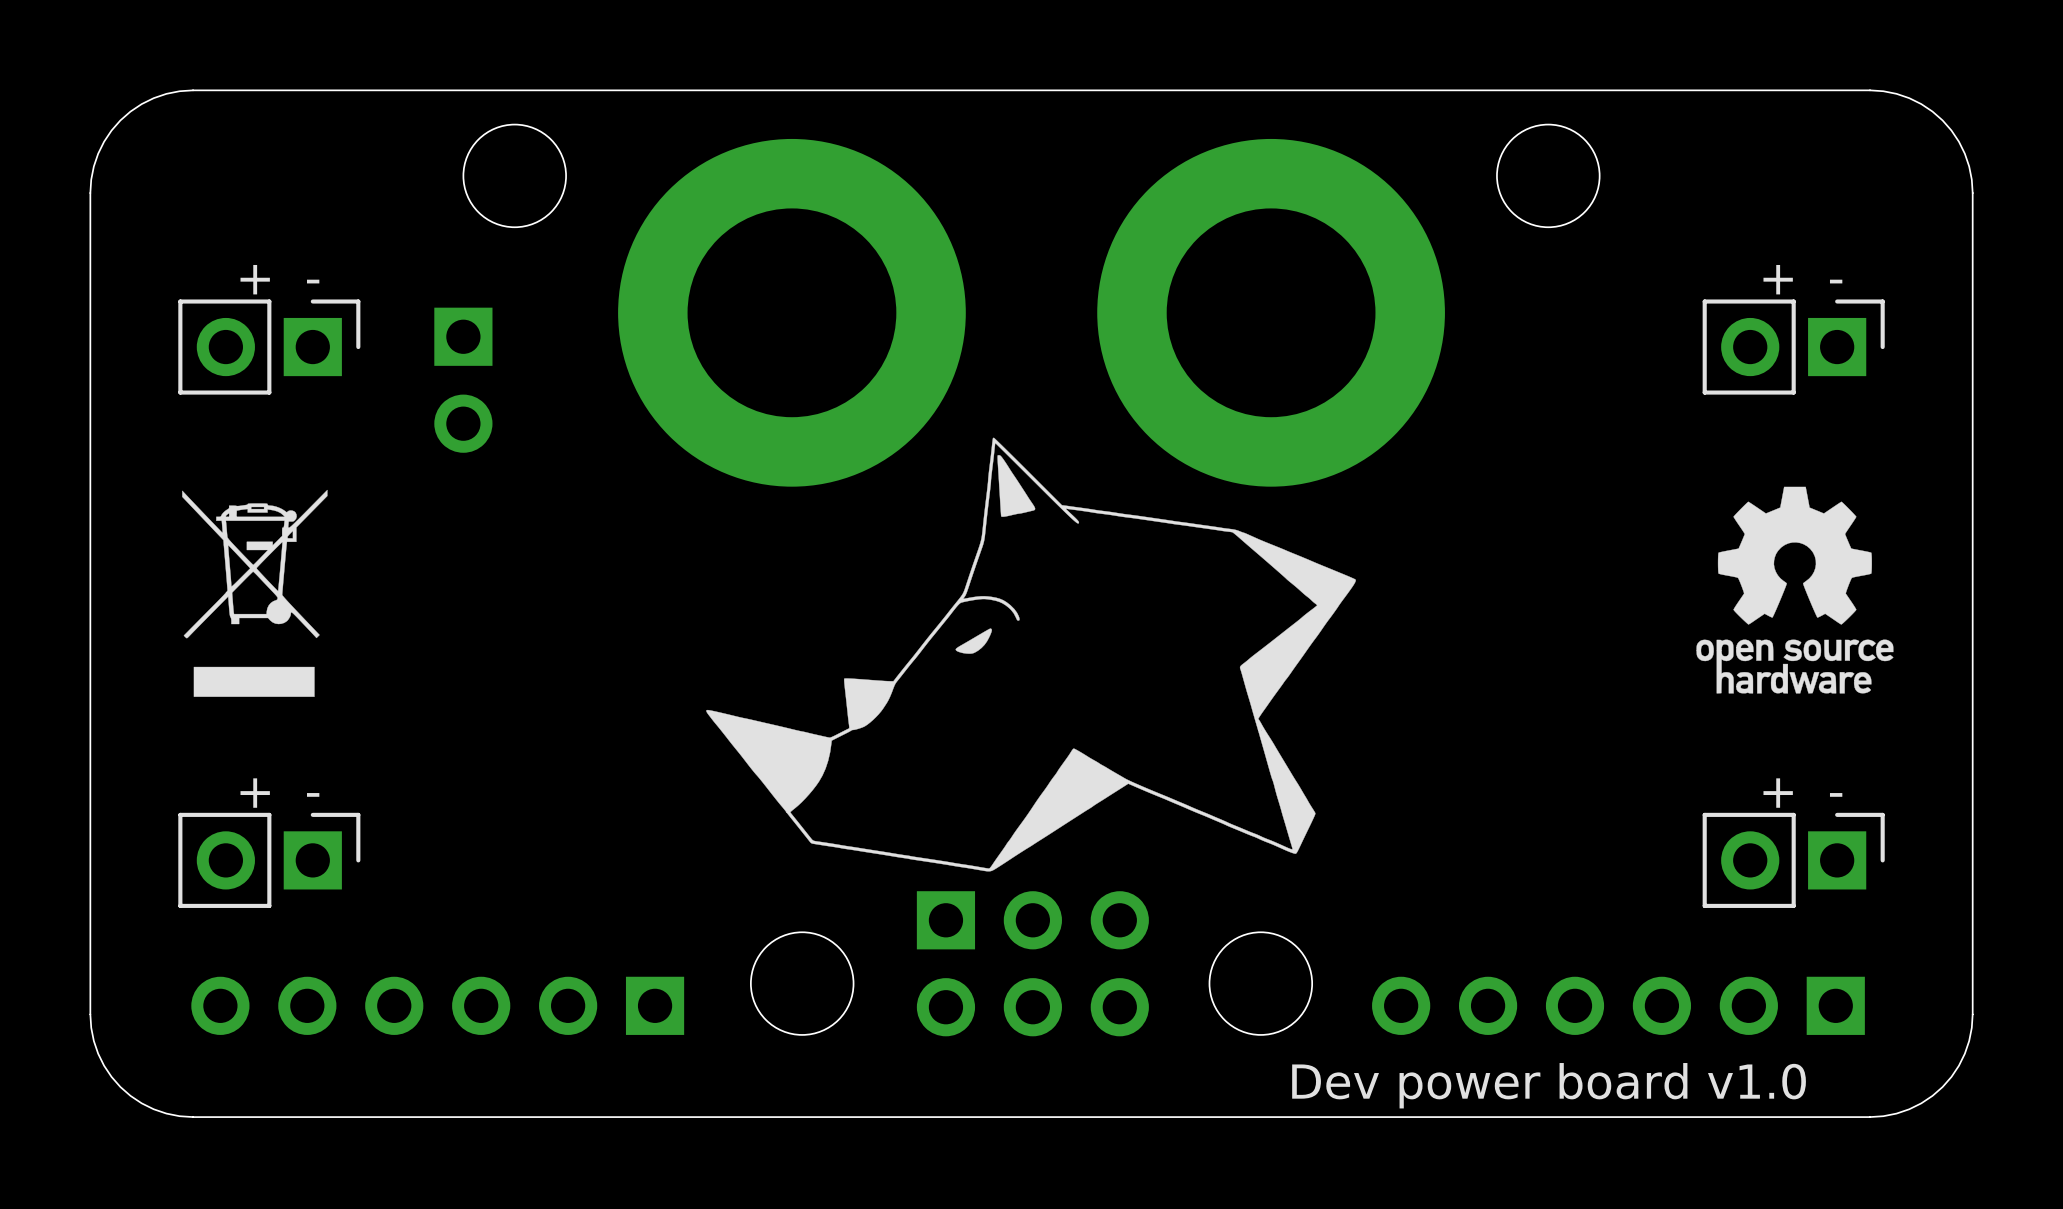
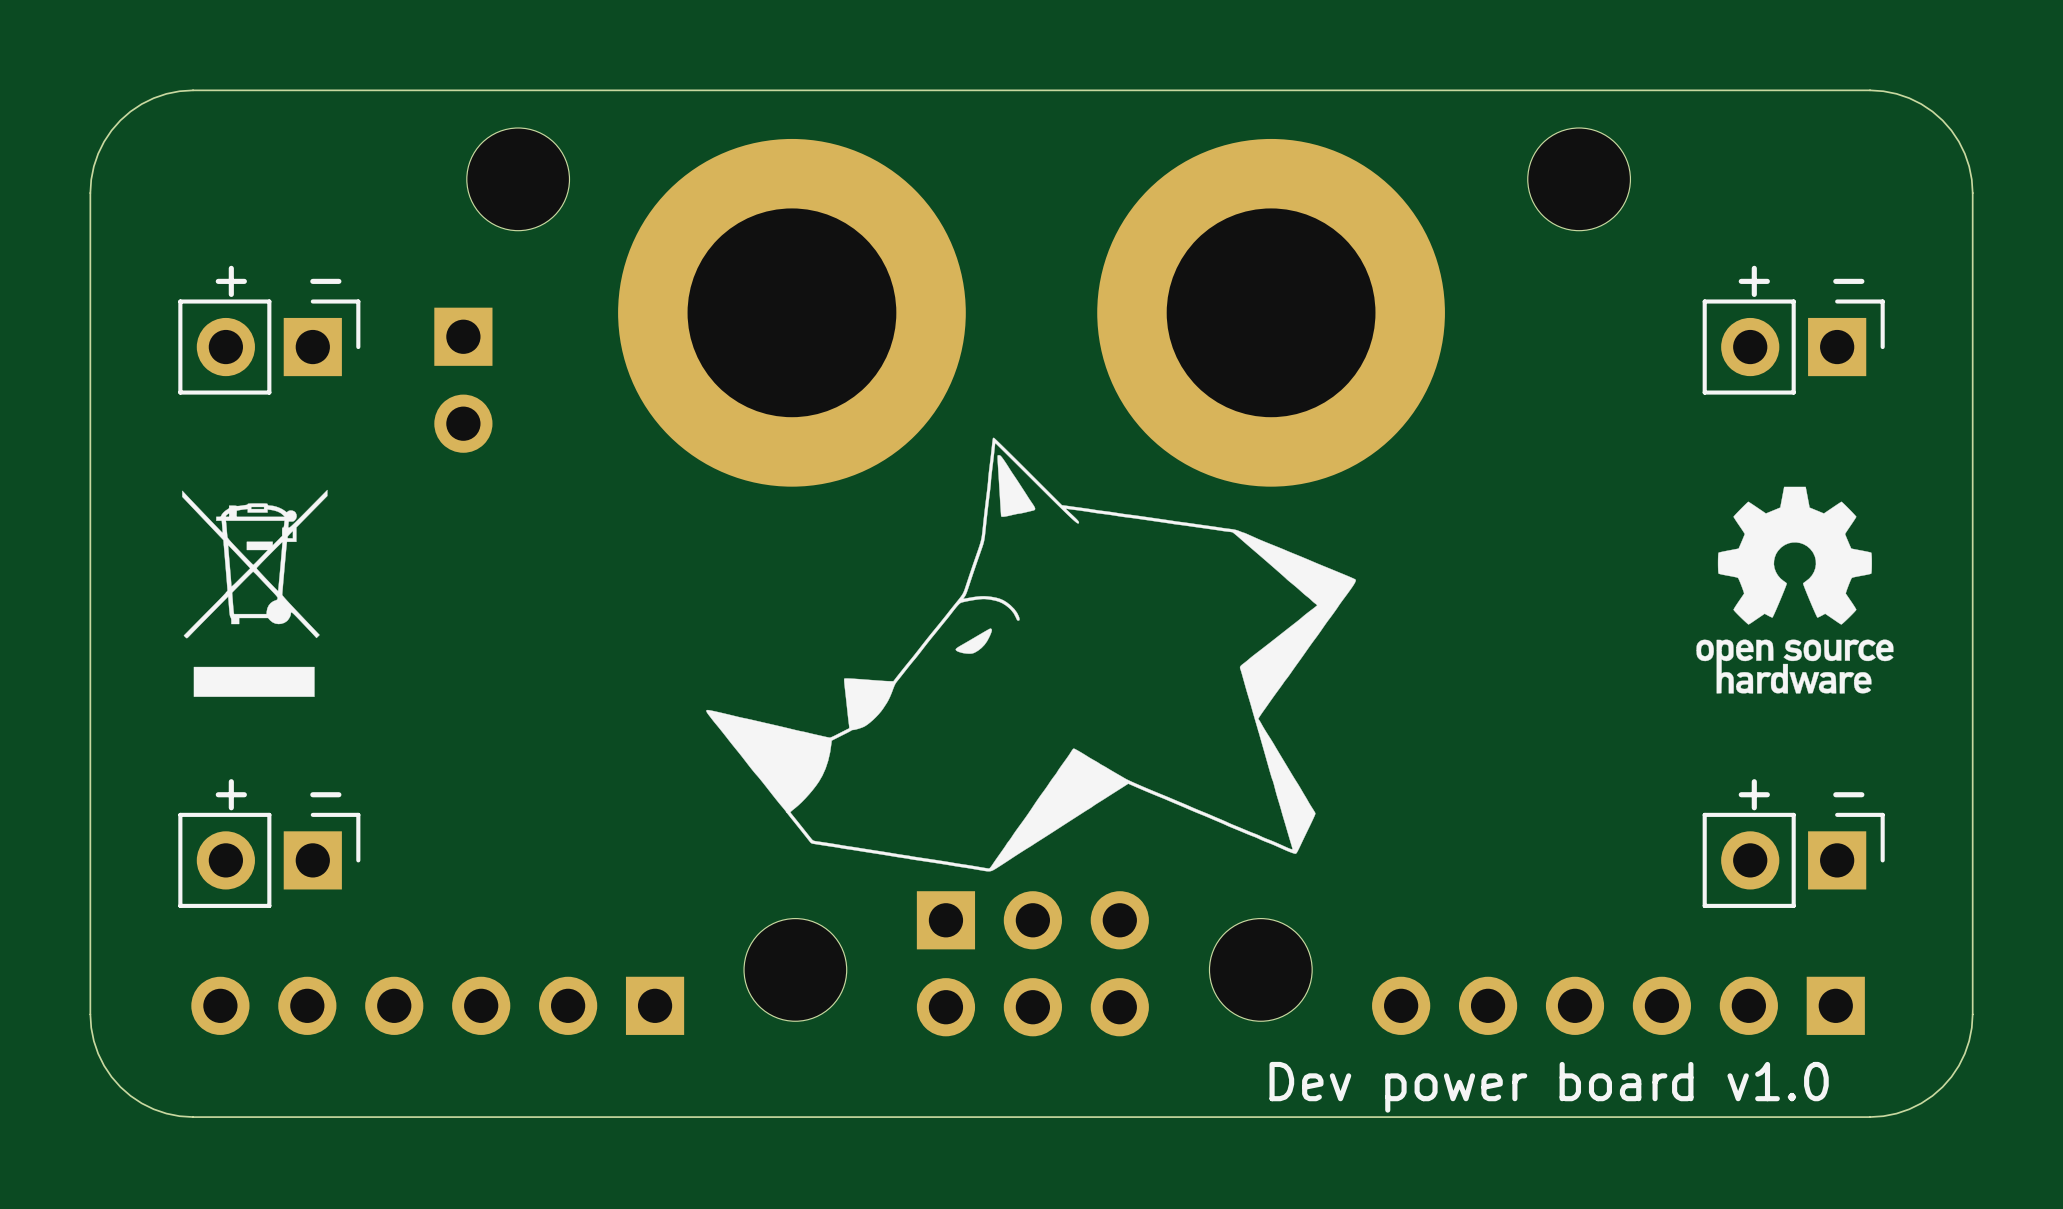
round board edge: [462, 123, 567, 229] -> none
round board edge: [1496, 123, 1601, 229] -> none
part: none -> (518, 179)
part: none -> (1579, 179)
round board edge: [750, 931, 855, 1036] -> none
round board edge: [1208, 931, 1314, 1036] -> none
part: none -> (795, 969)
part: none -> (1260, 969)

